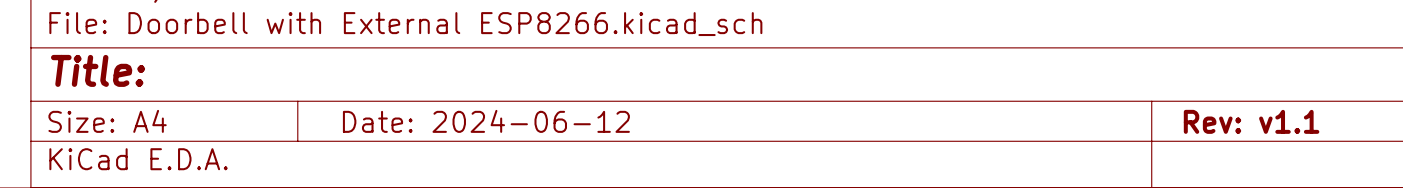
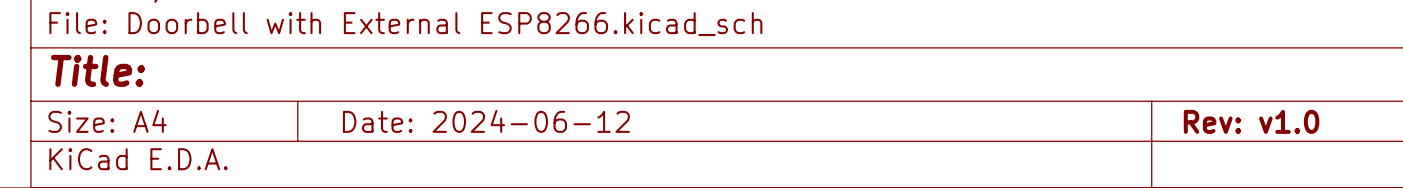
title block: Rev: v1.1 (1251, 121) -> Rev: v1.0 (1251, 121)

